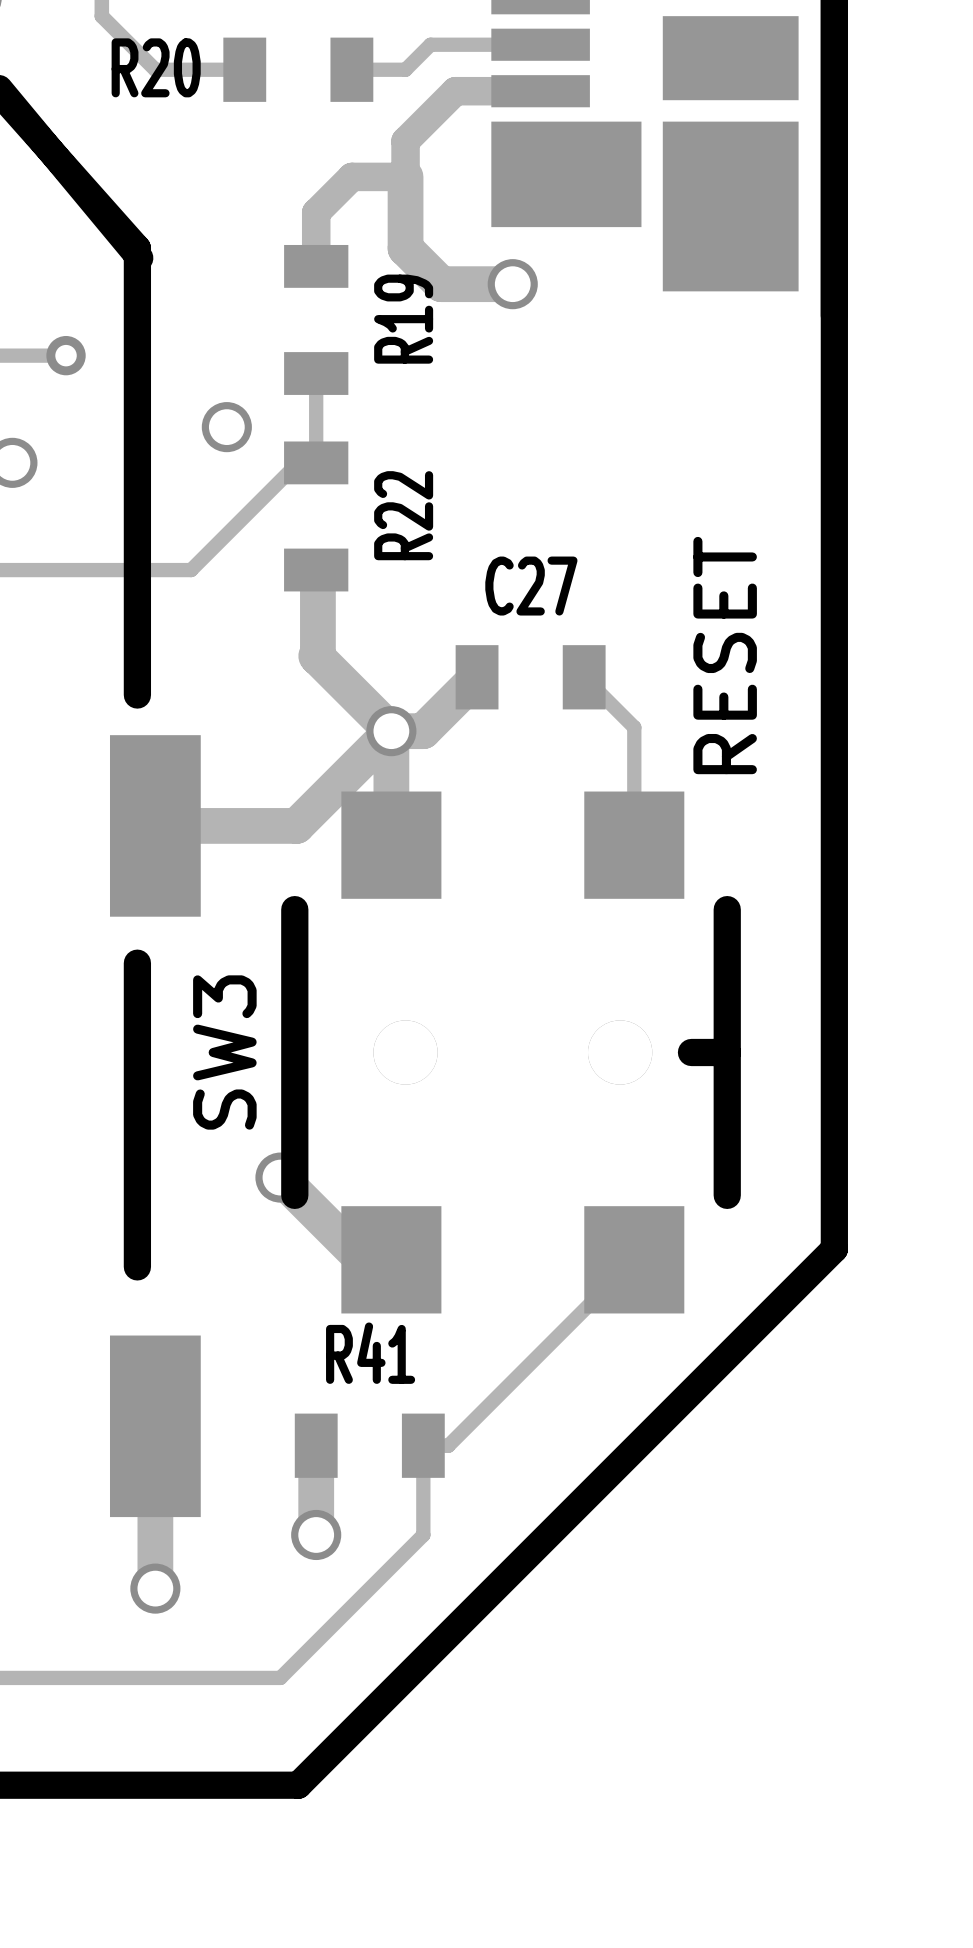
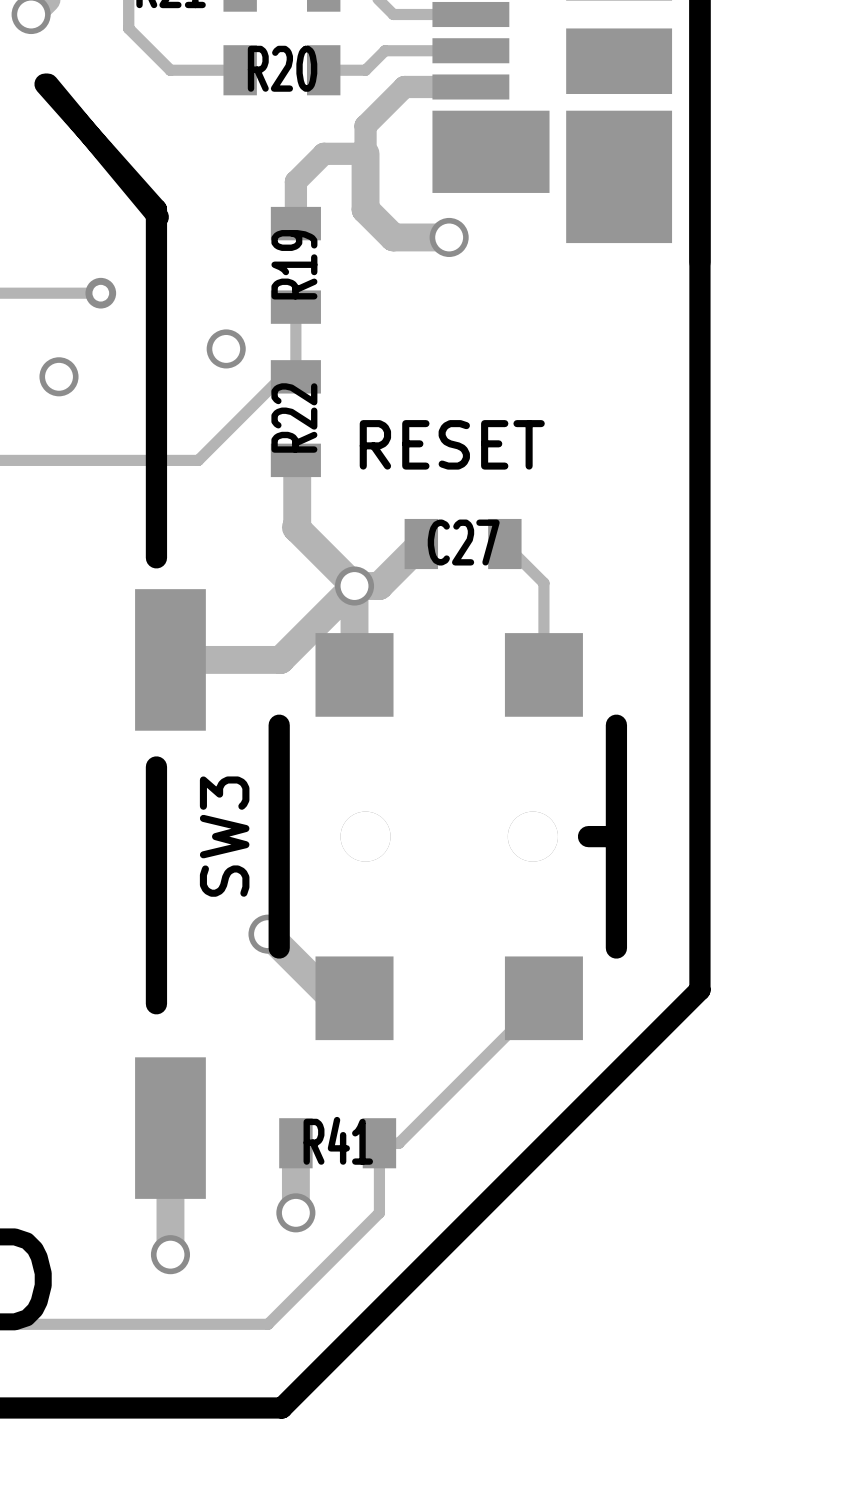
R20 name position: R20 (156, 67) -> R20 (282, 68)
R19 name position: R19 (403, 319) -> R19 (294, 264)
R22 name position: R22 (403, 515) -> R22 (294, 417)
C27 name position: C27 (531, 586) -> C27 (463, 542)
SW3 value rotation: 0° (725, 655) -> 90° clockwise (452, 444)
R41 name position: R41 (370, 1353) -> R41 (338, 1140)

